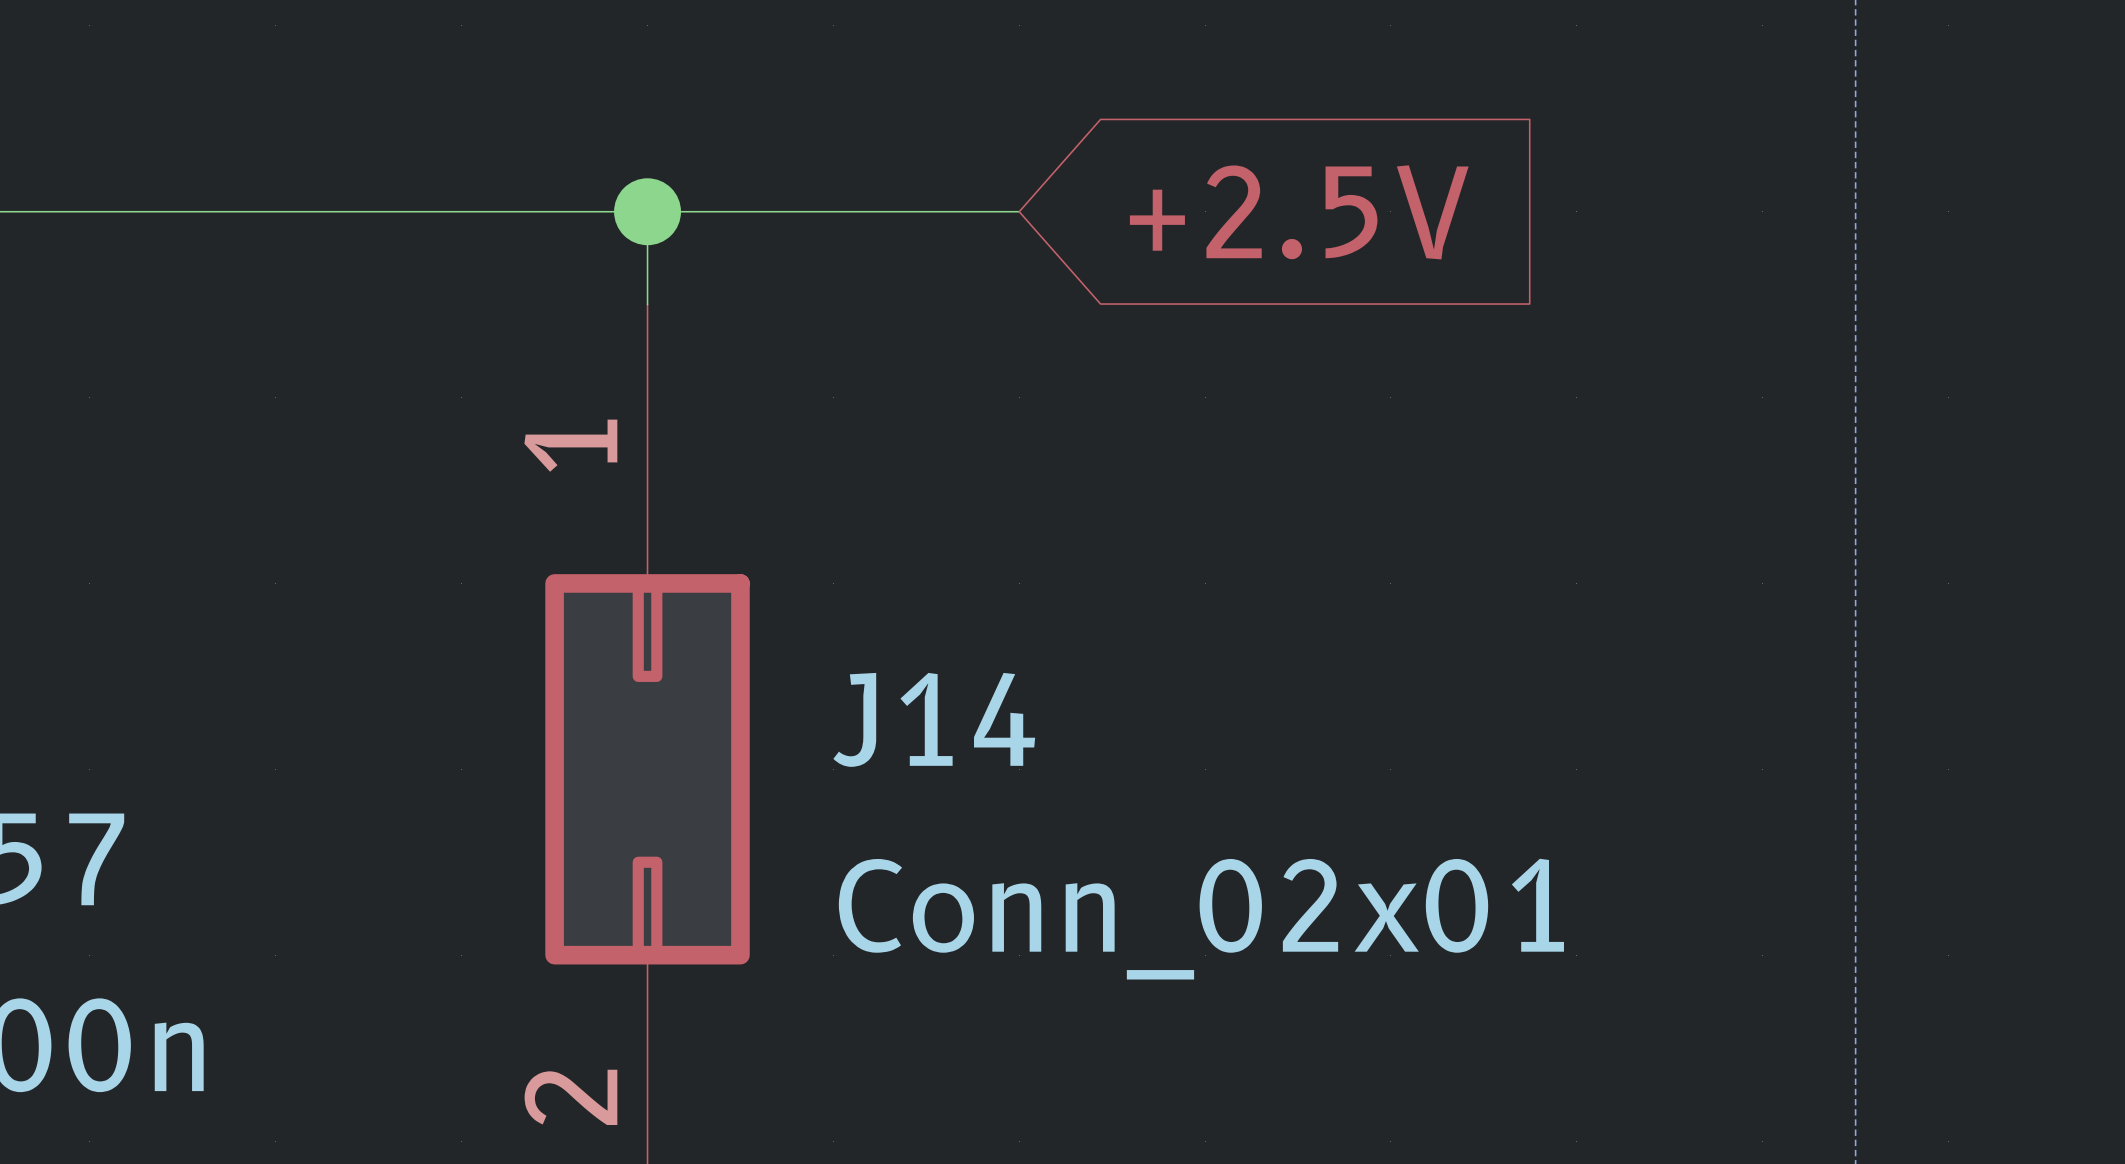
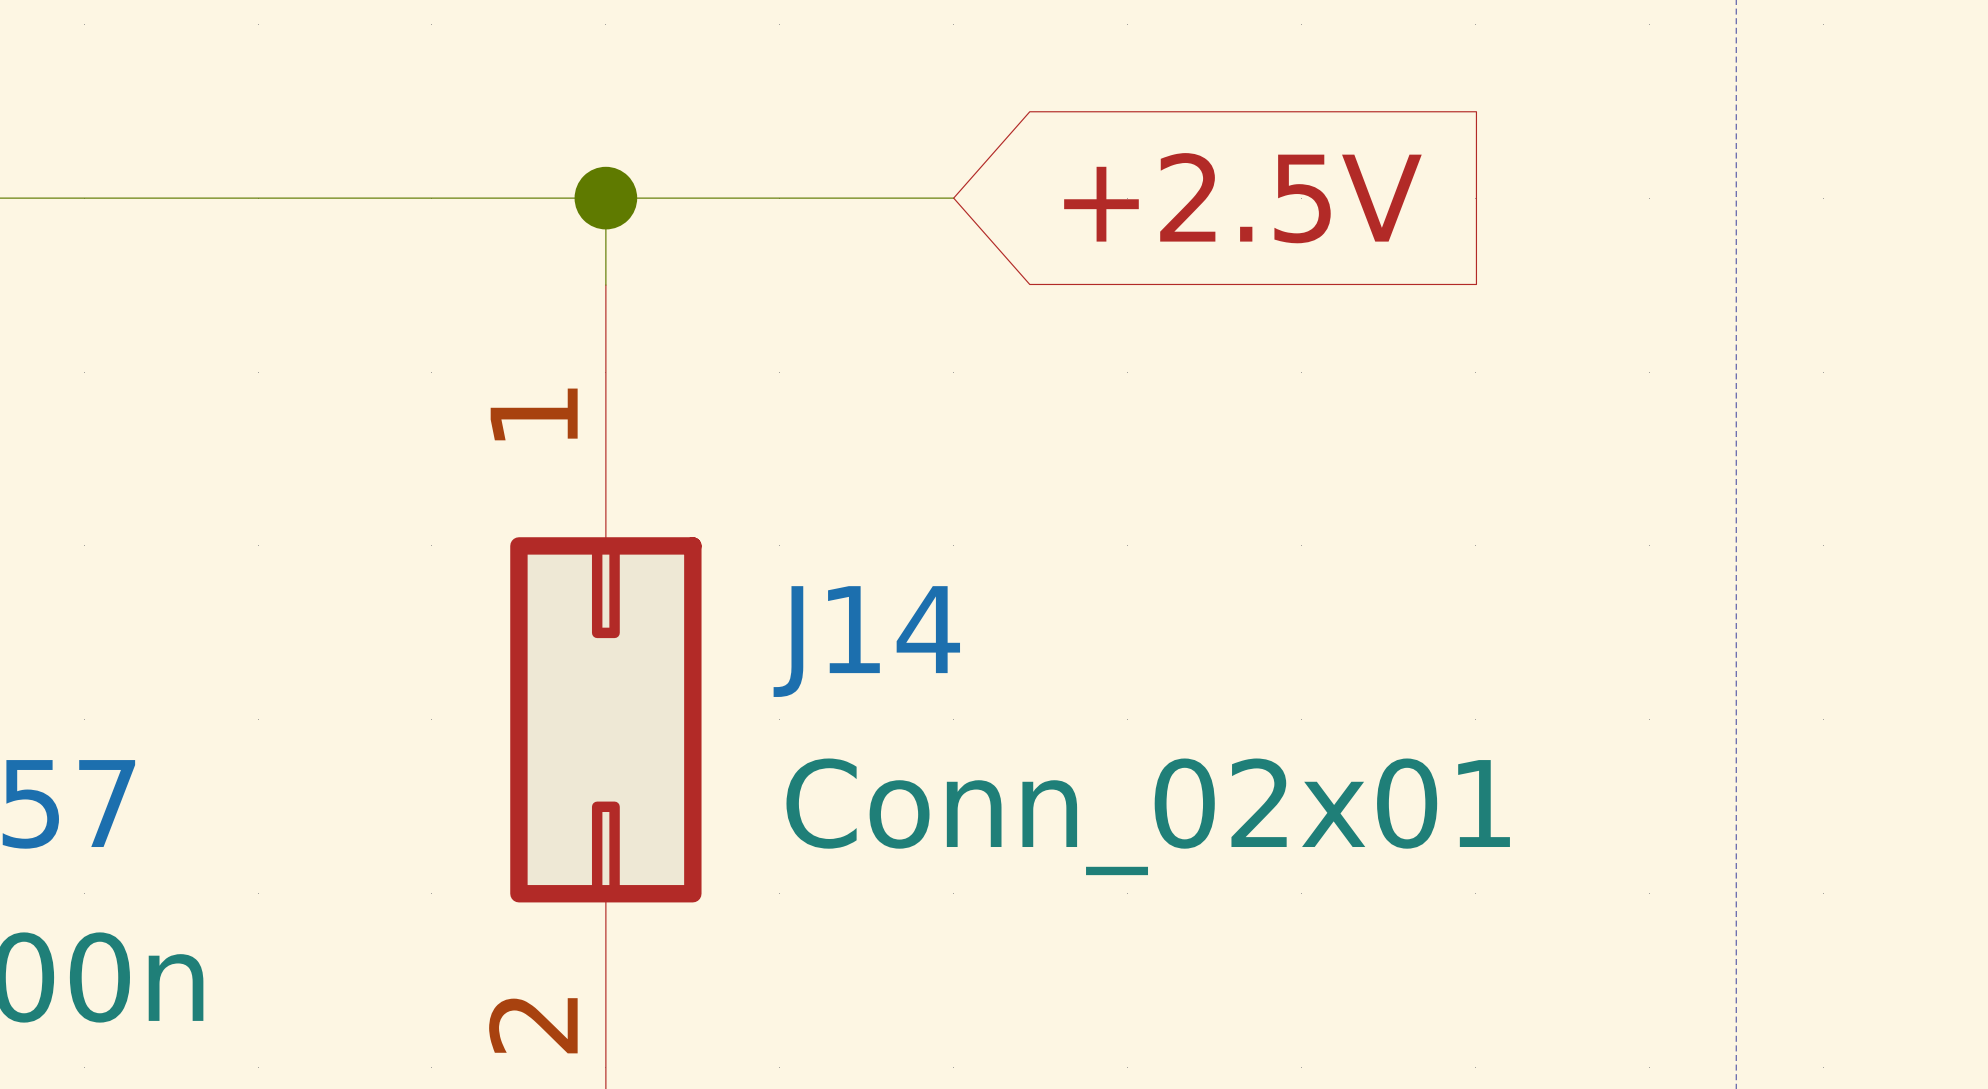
J14 name position: J14 (934, 719) -> J14 (866, 641)
J14 value position: Conn_02x01 (1201, 919) -> Conn_02x01 (1148, 816)

